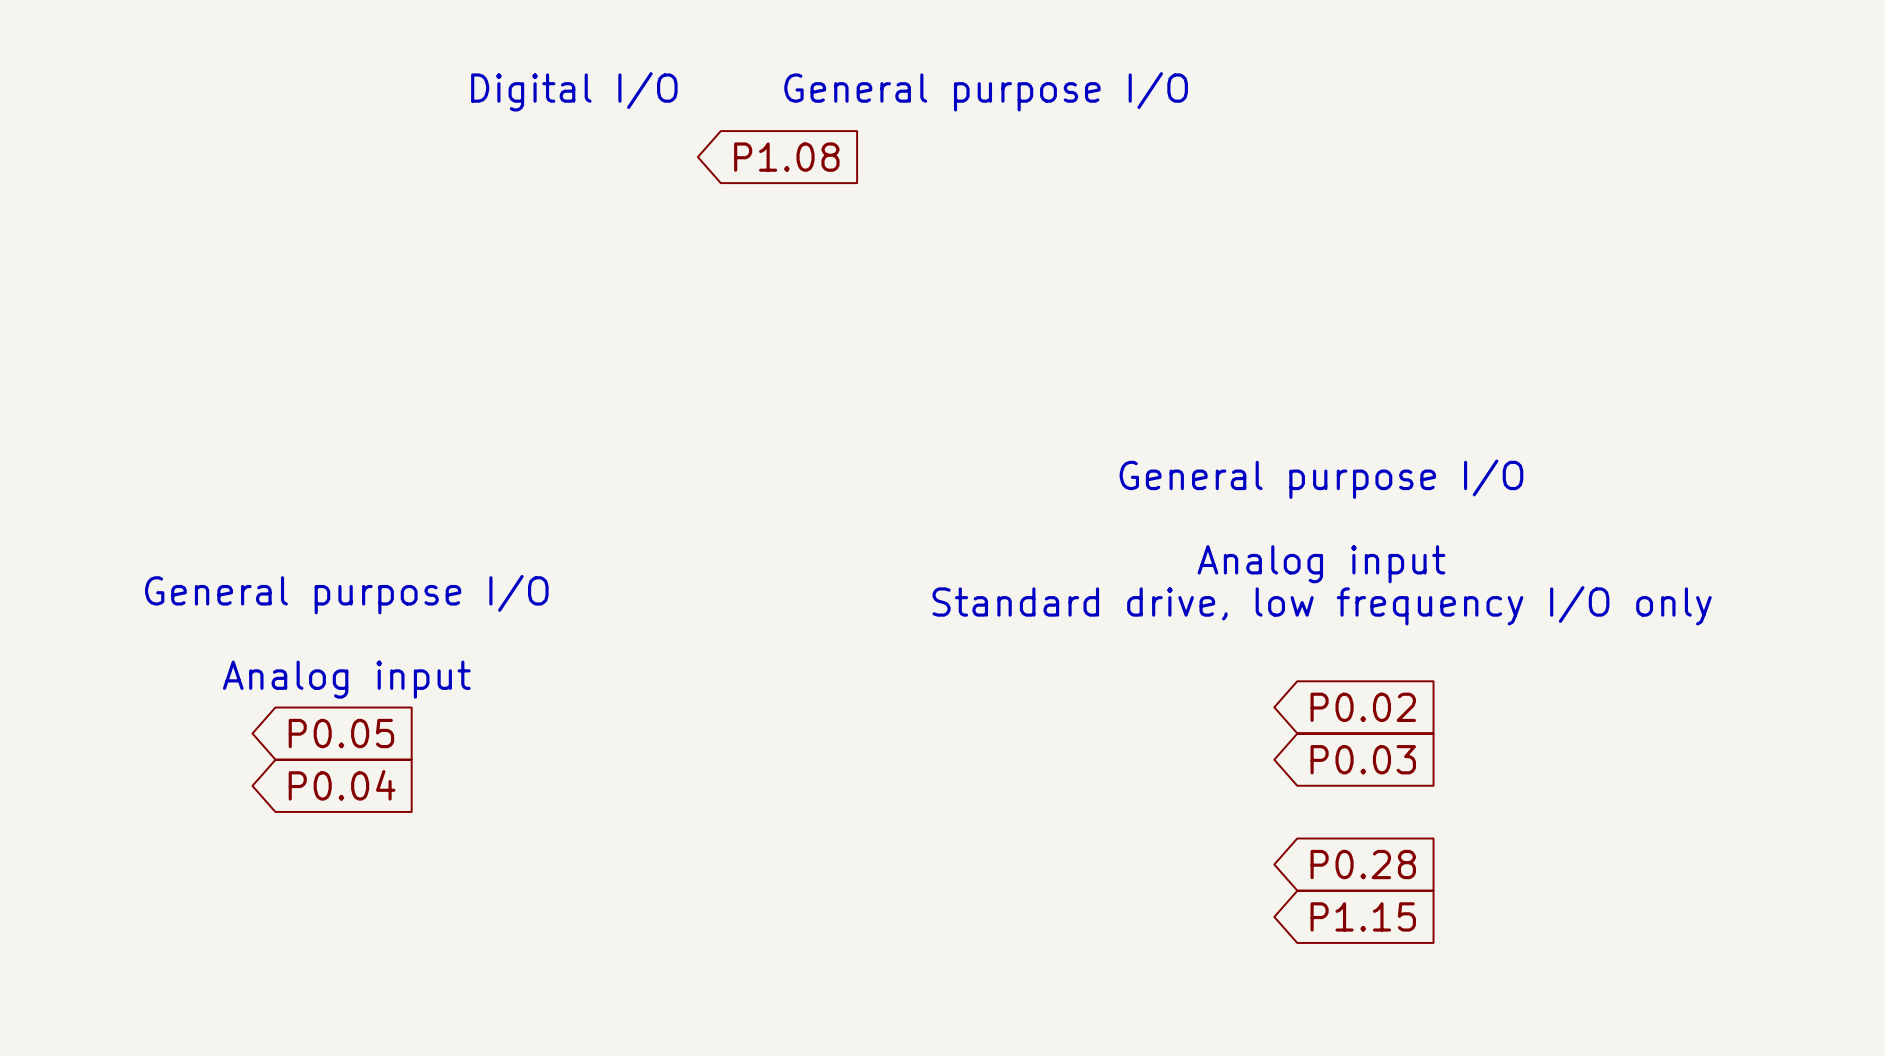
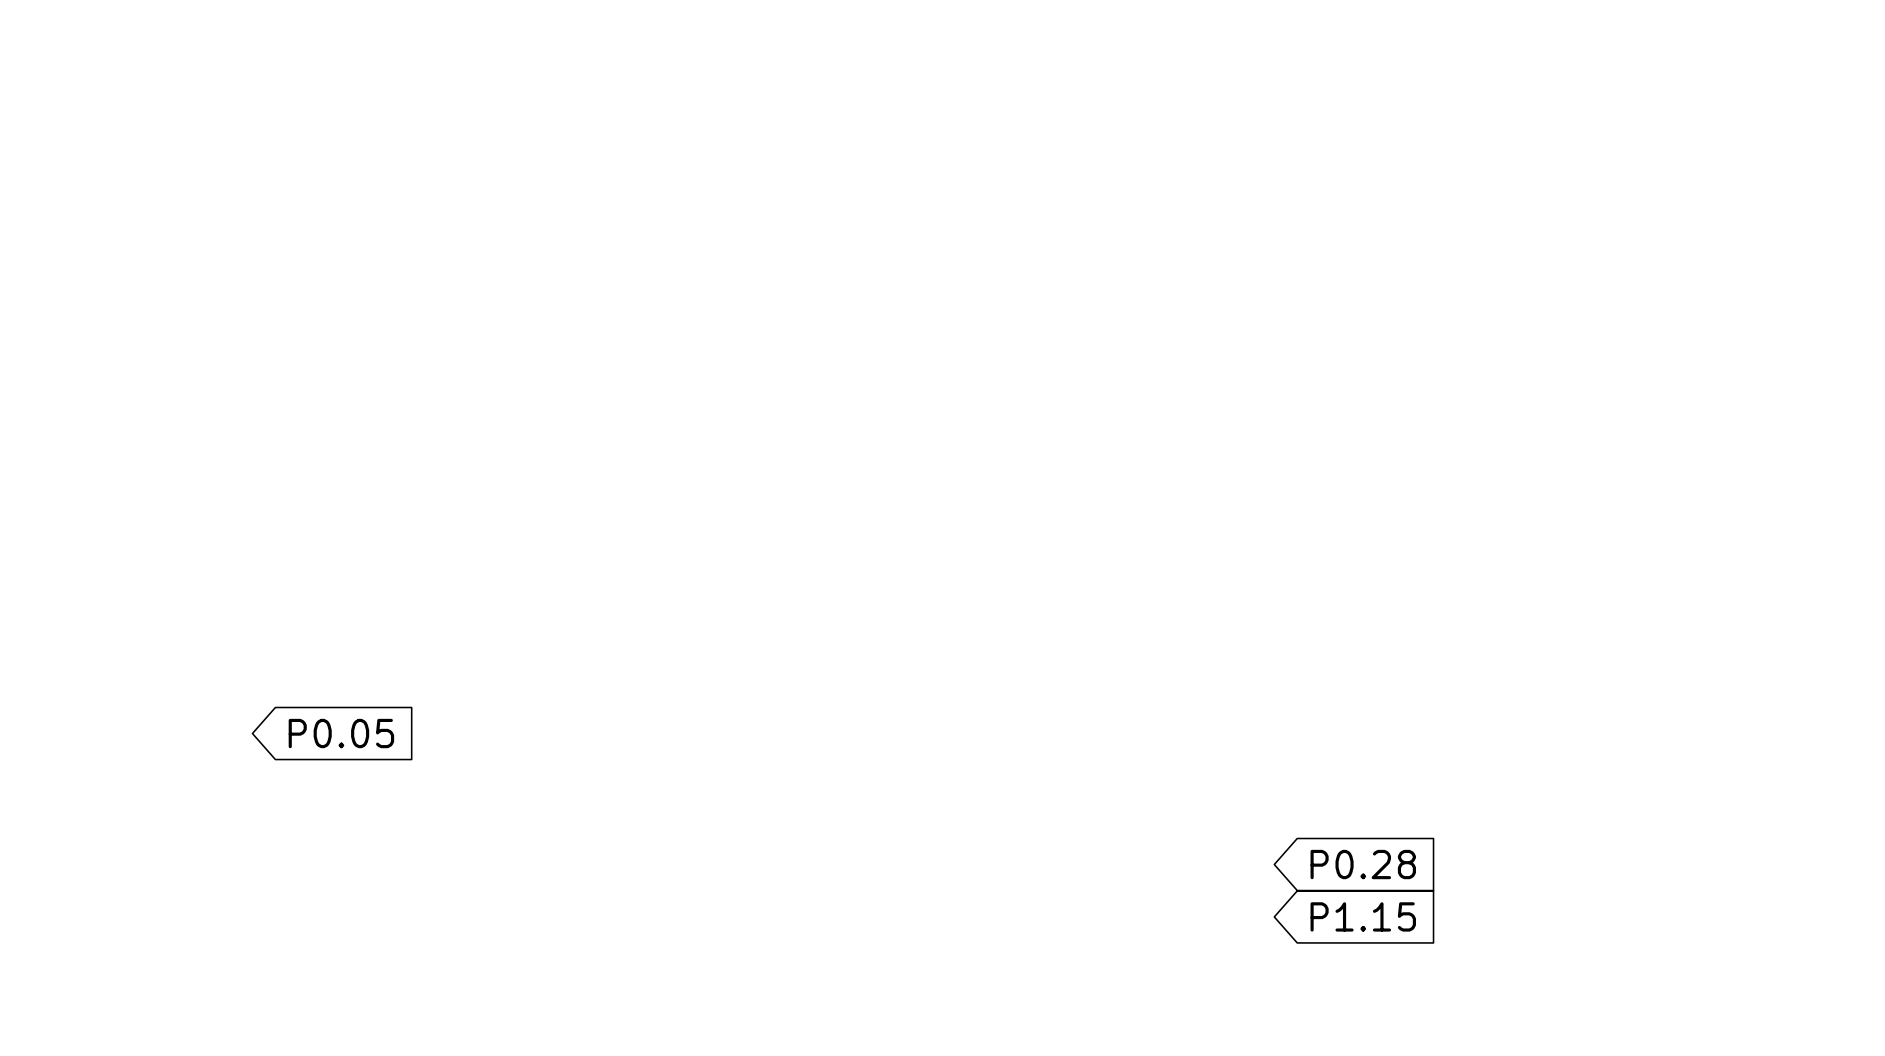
text: Digital I/O General purpose I/O (829, 91) -> none
global label: P1.08 (786, 157) -> none
text: General purpose I/O (1321, 479) -> none
text: Analog input (1321, 564) -> none
text: General purpose I/O (346, 594) -> none
text: Standard drive, low frequency I/O only (1322, 605) -> none
text: Analog input (346, 679) -> none
global label: P0.02 (1363, 707) -> none
global label: P0.03 (1363, 759) -> none
global label: P0.04 (342, 785) -> none

